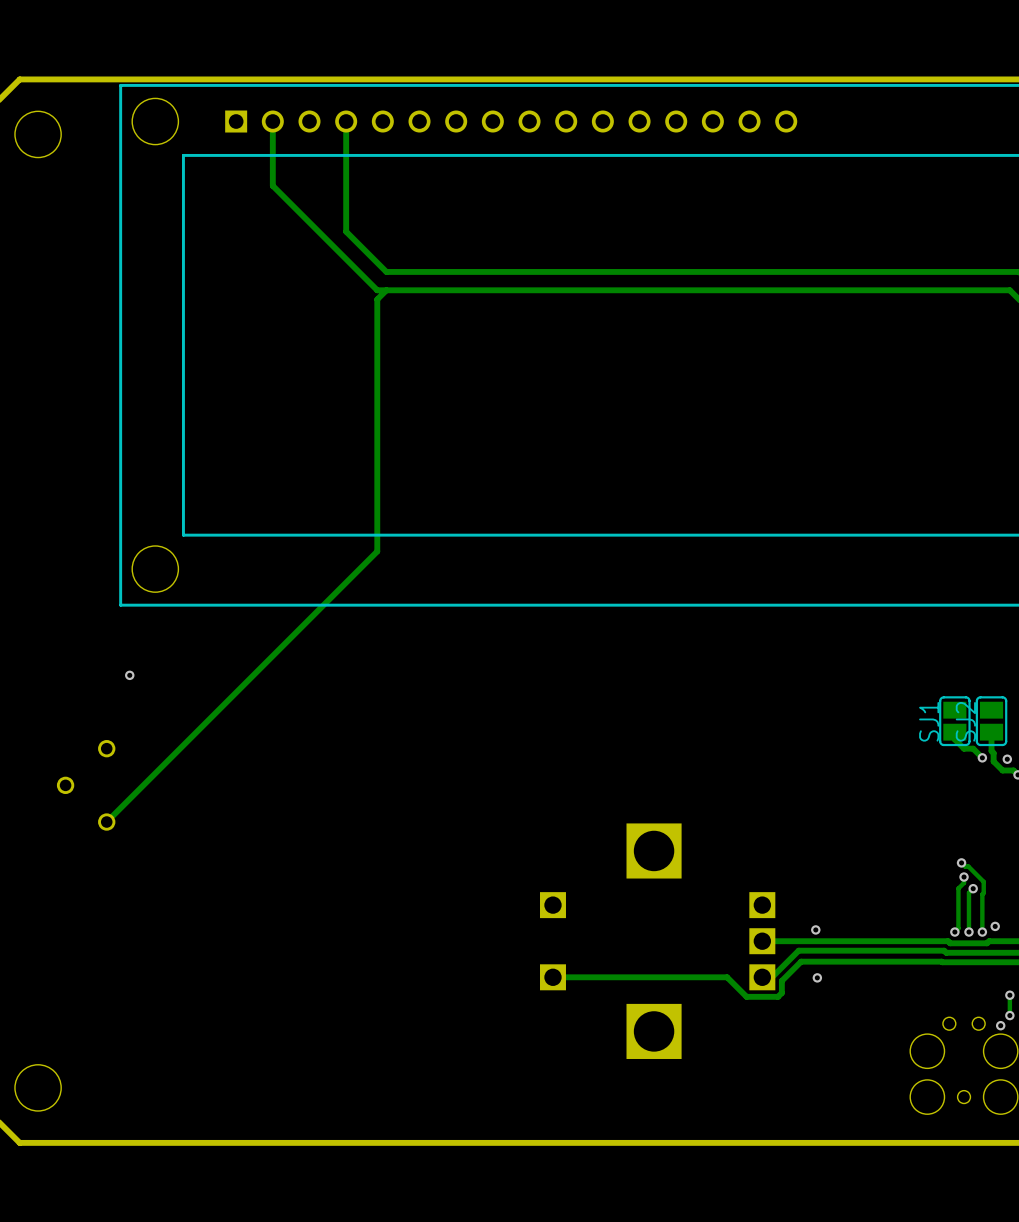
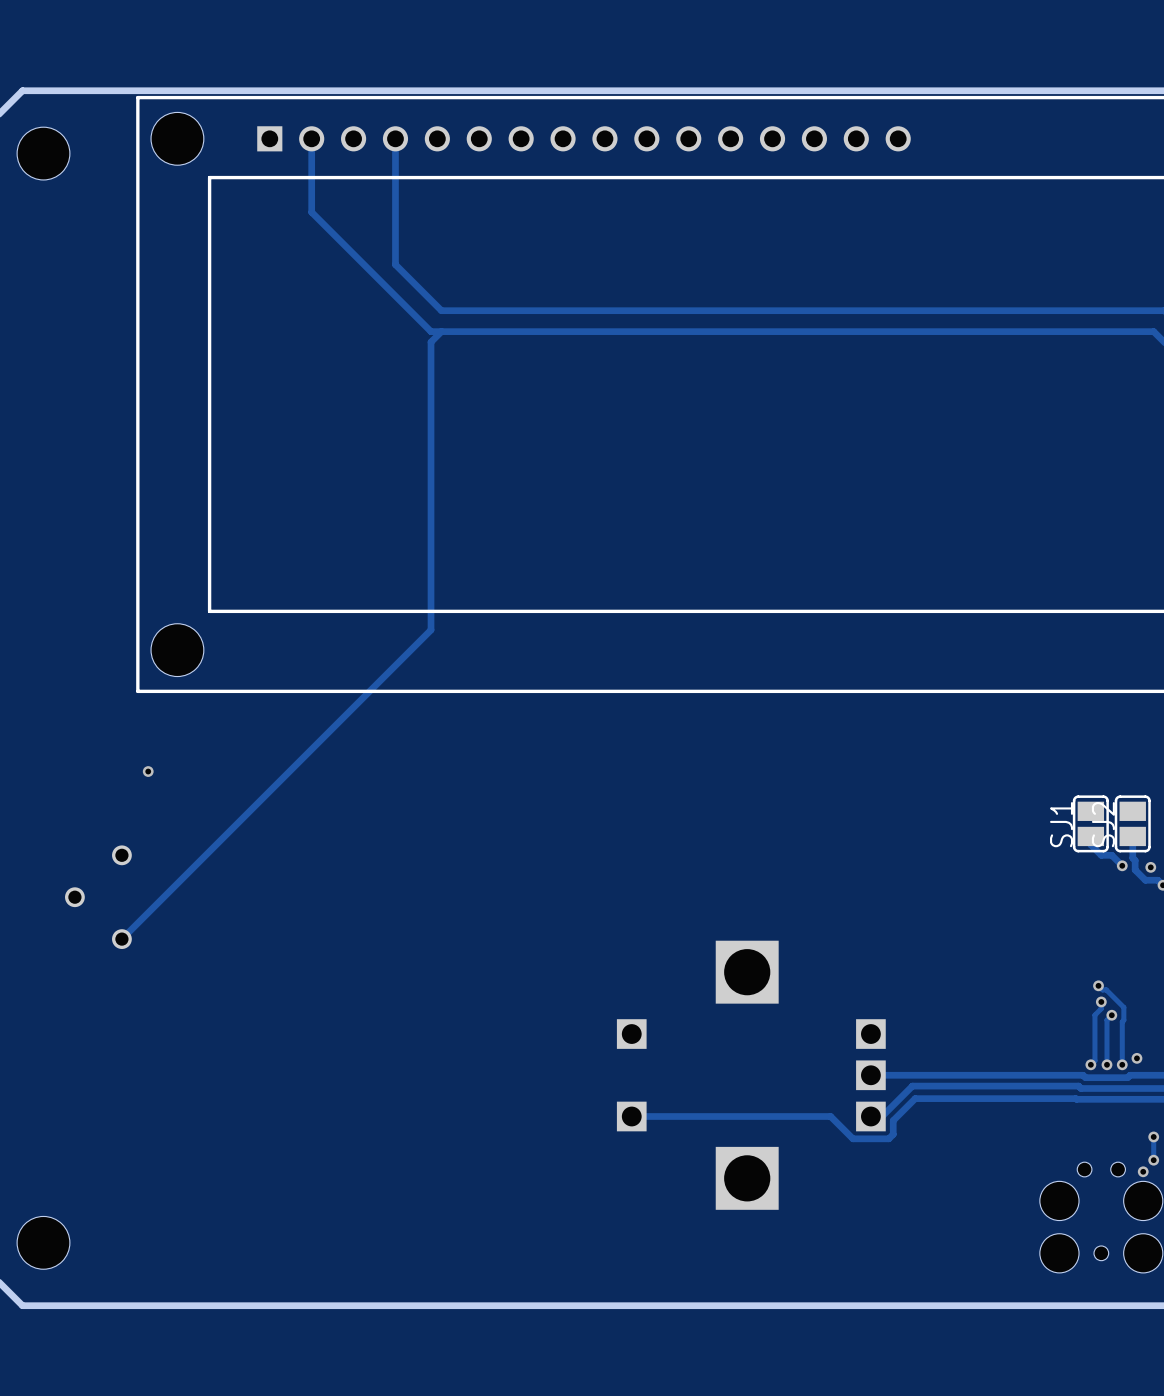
via: (815, 929) -> none
via: (817, 977) -> none

